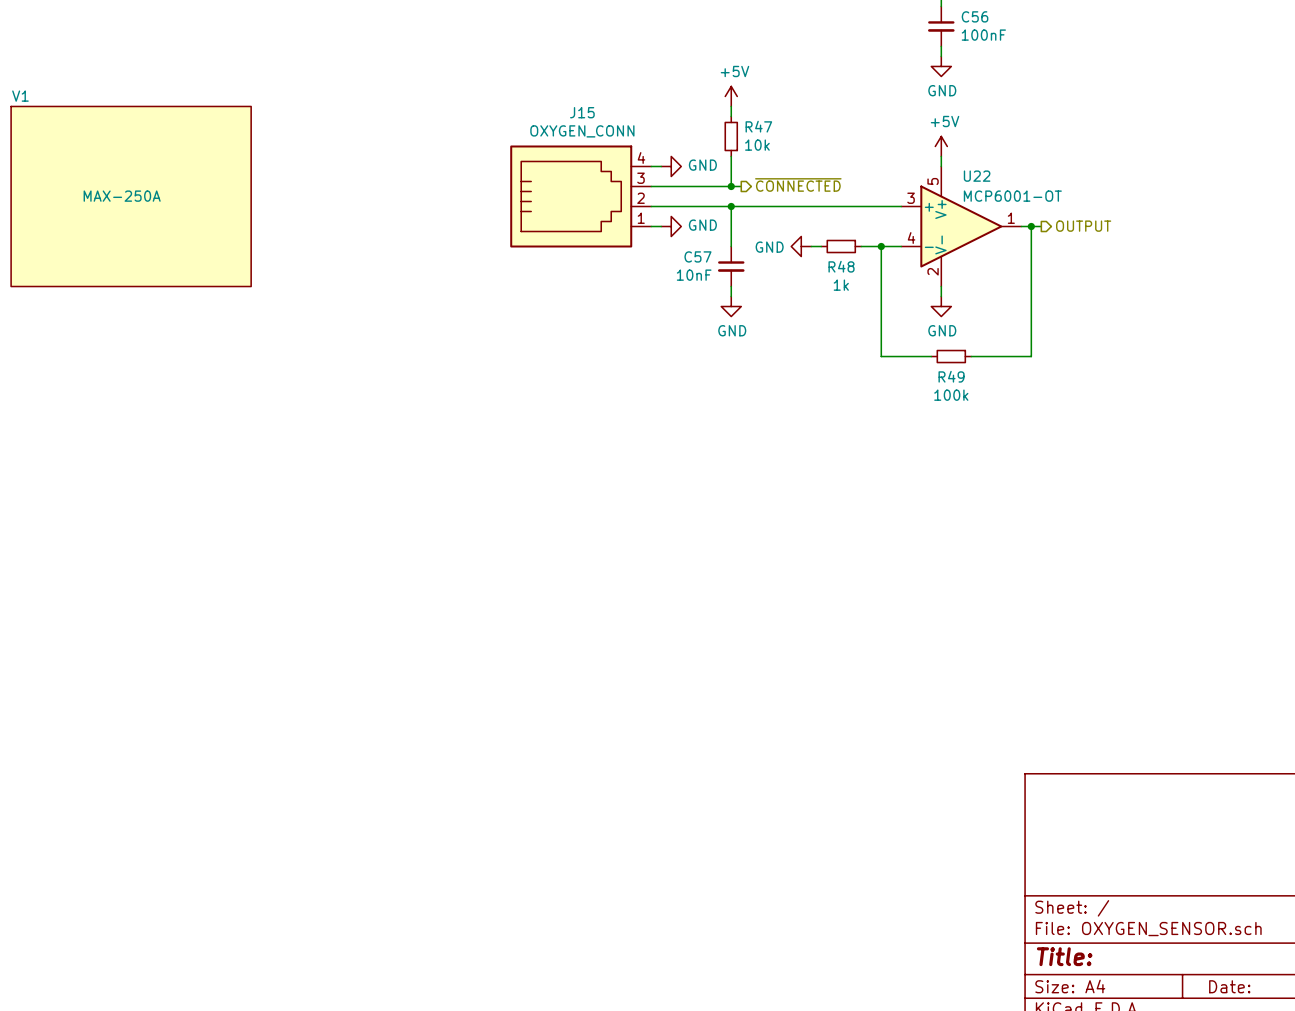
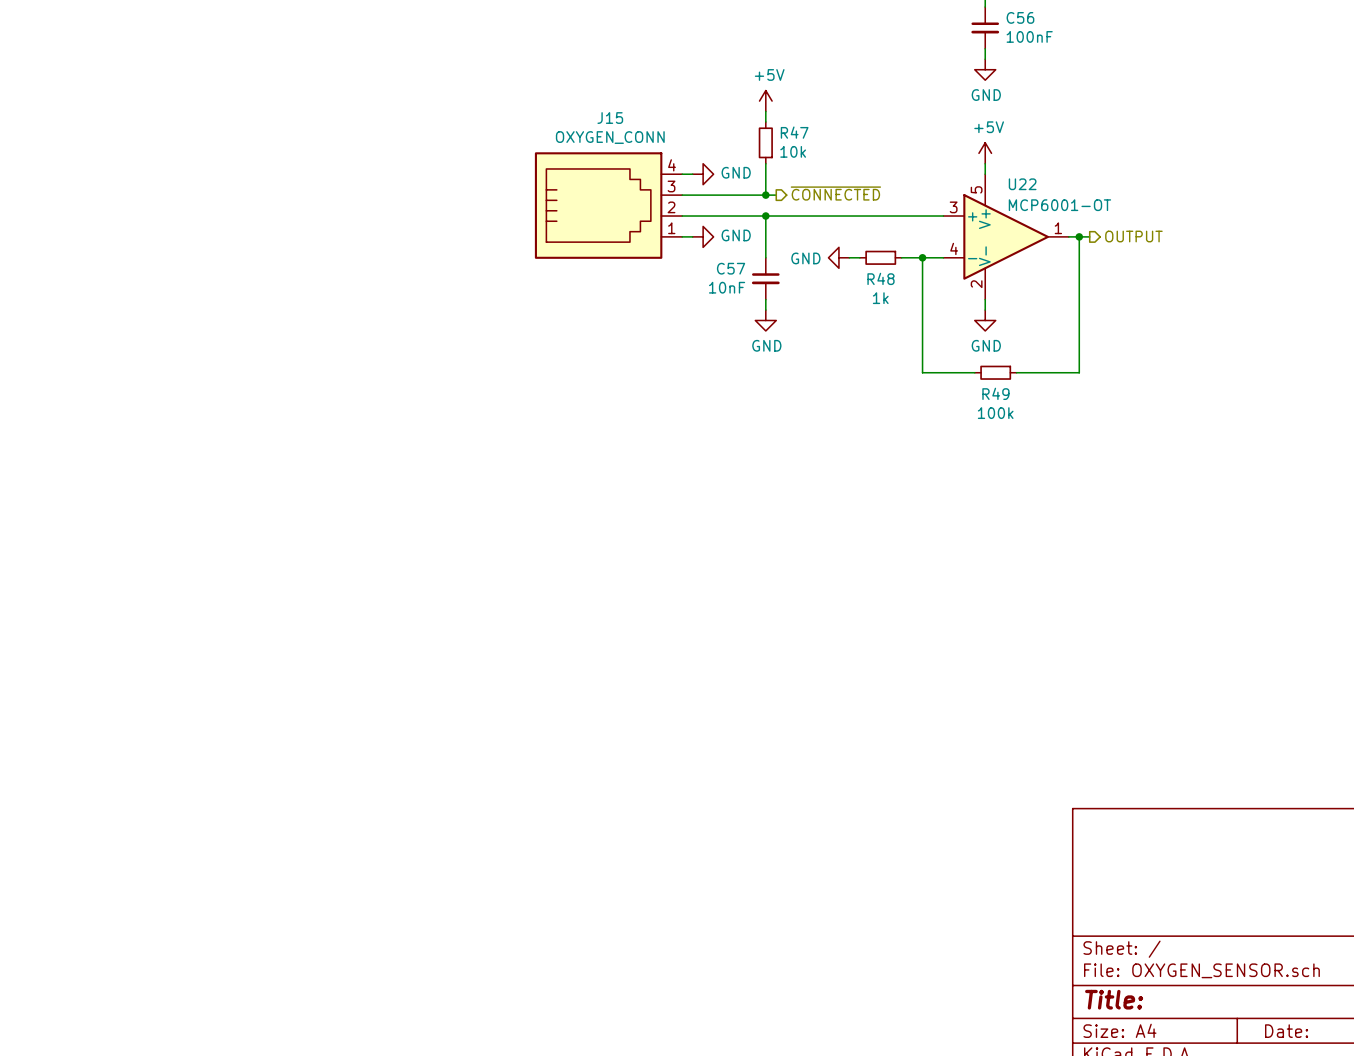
V1: MAX-250A (131, 196) -> none

